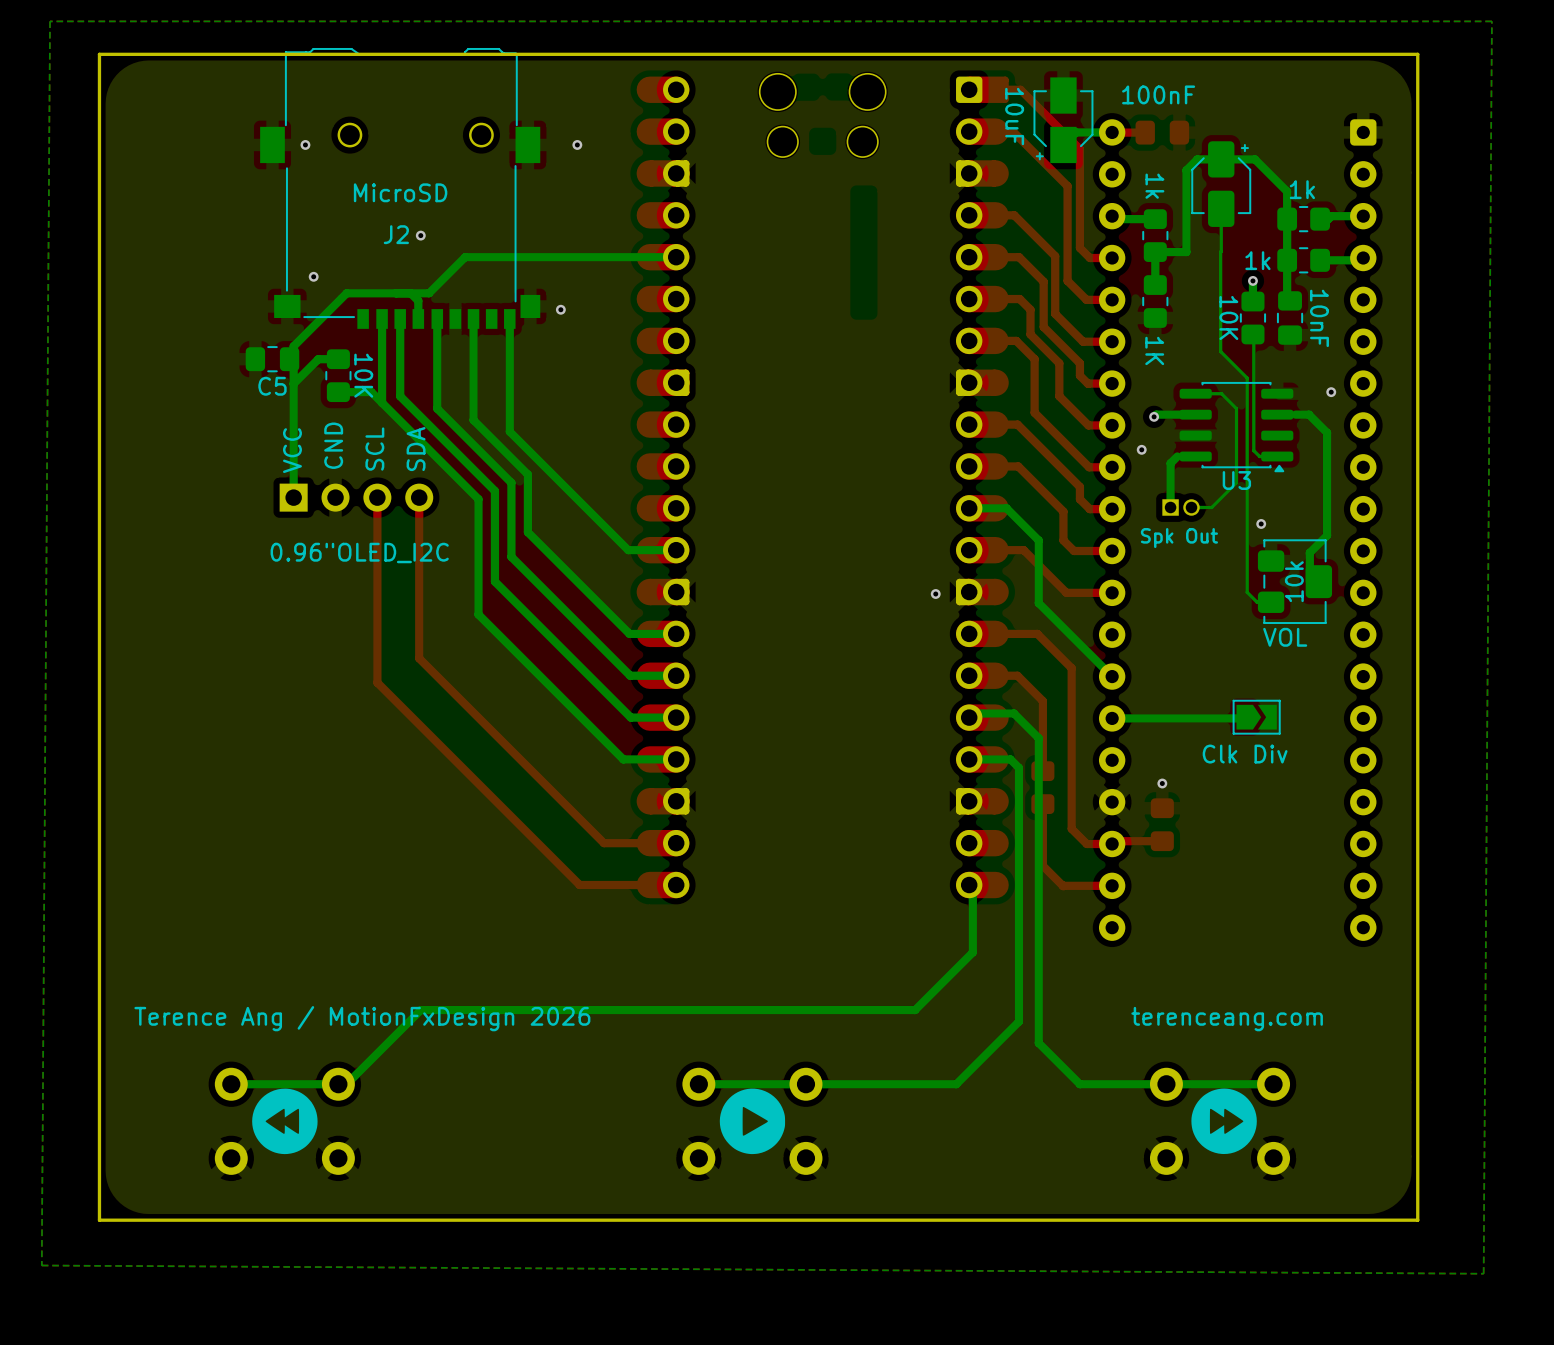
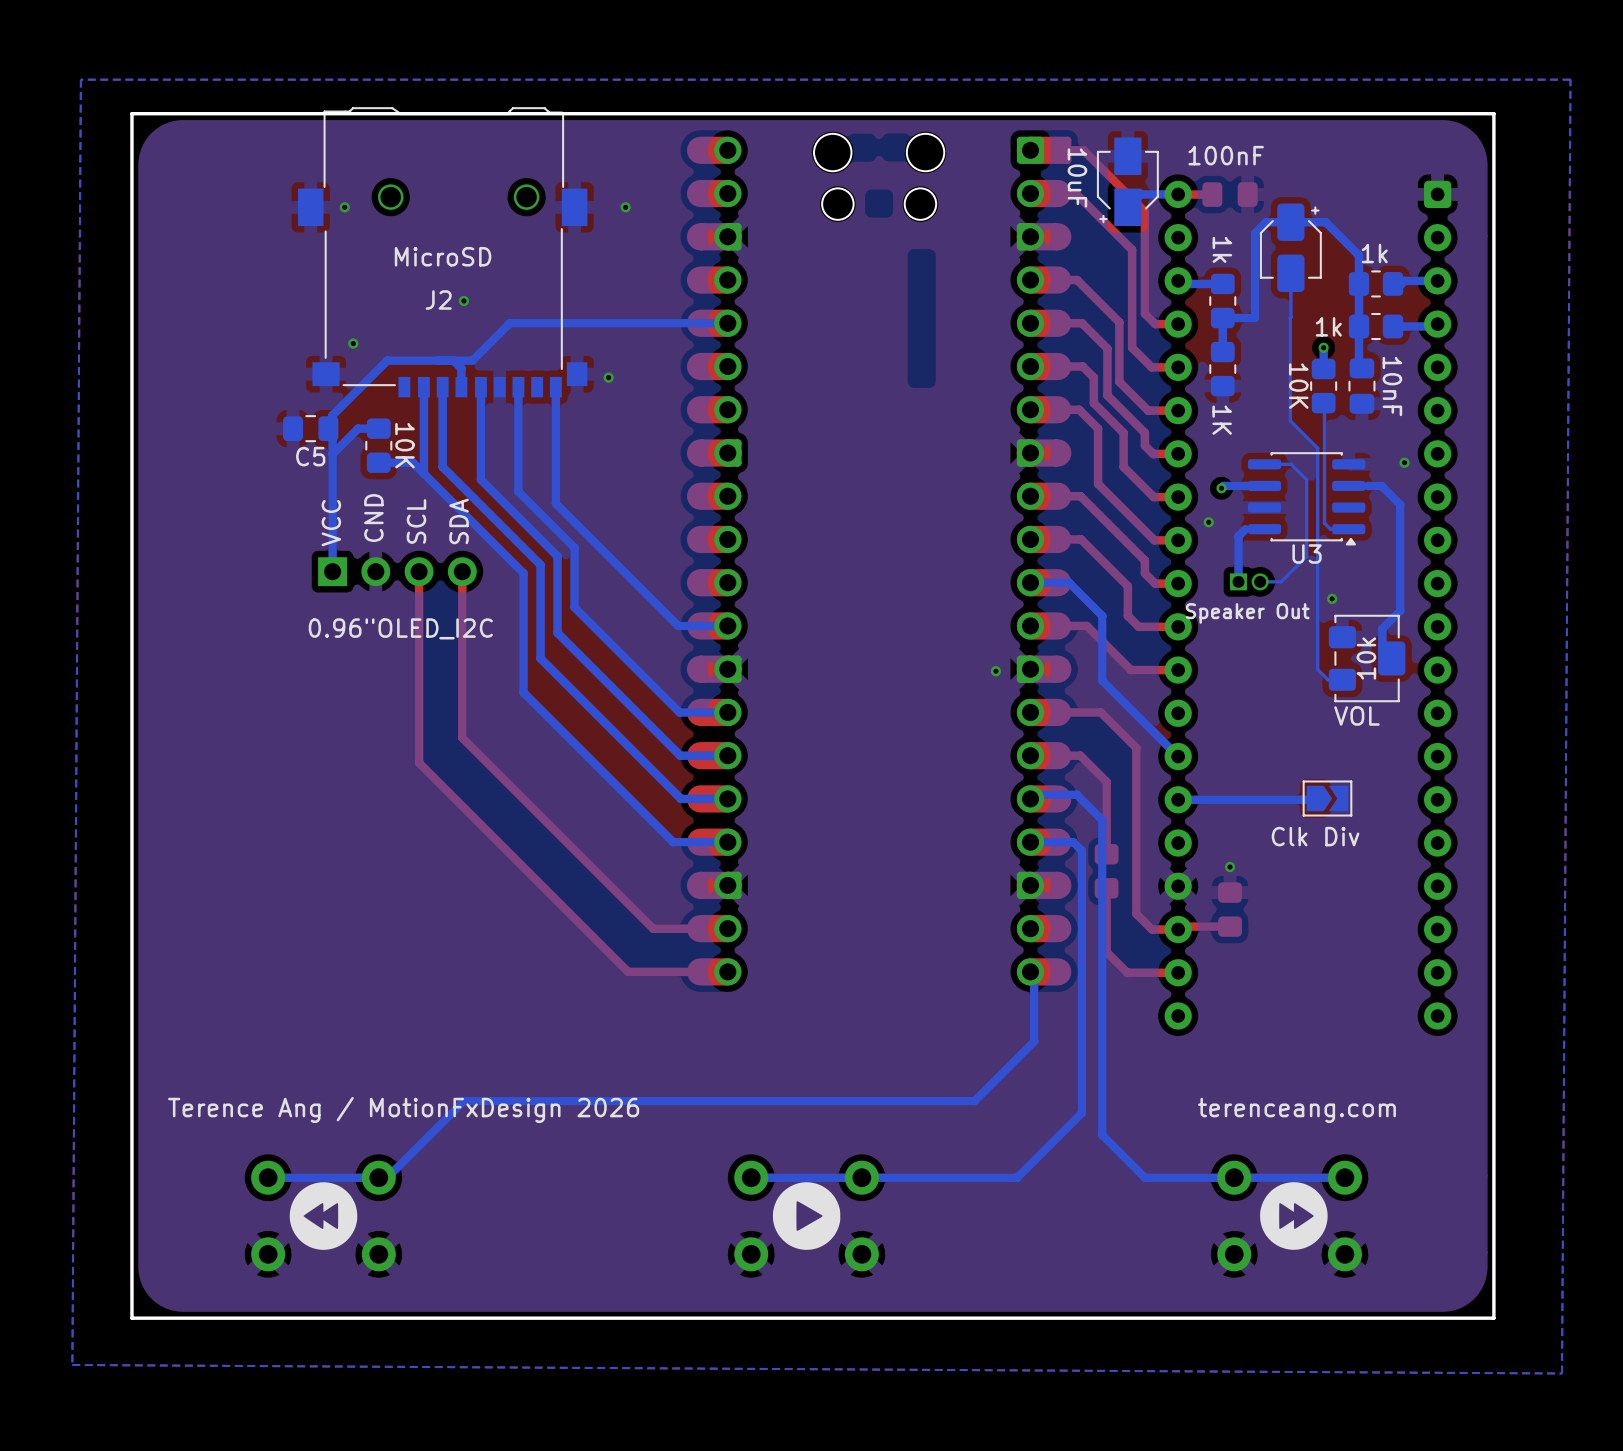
part value: Spk Out (1179, 538) -> Speaker Out (1247, 613)

